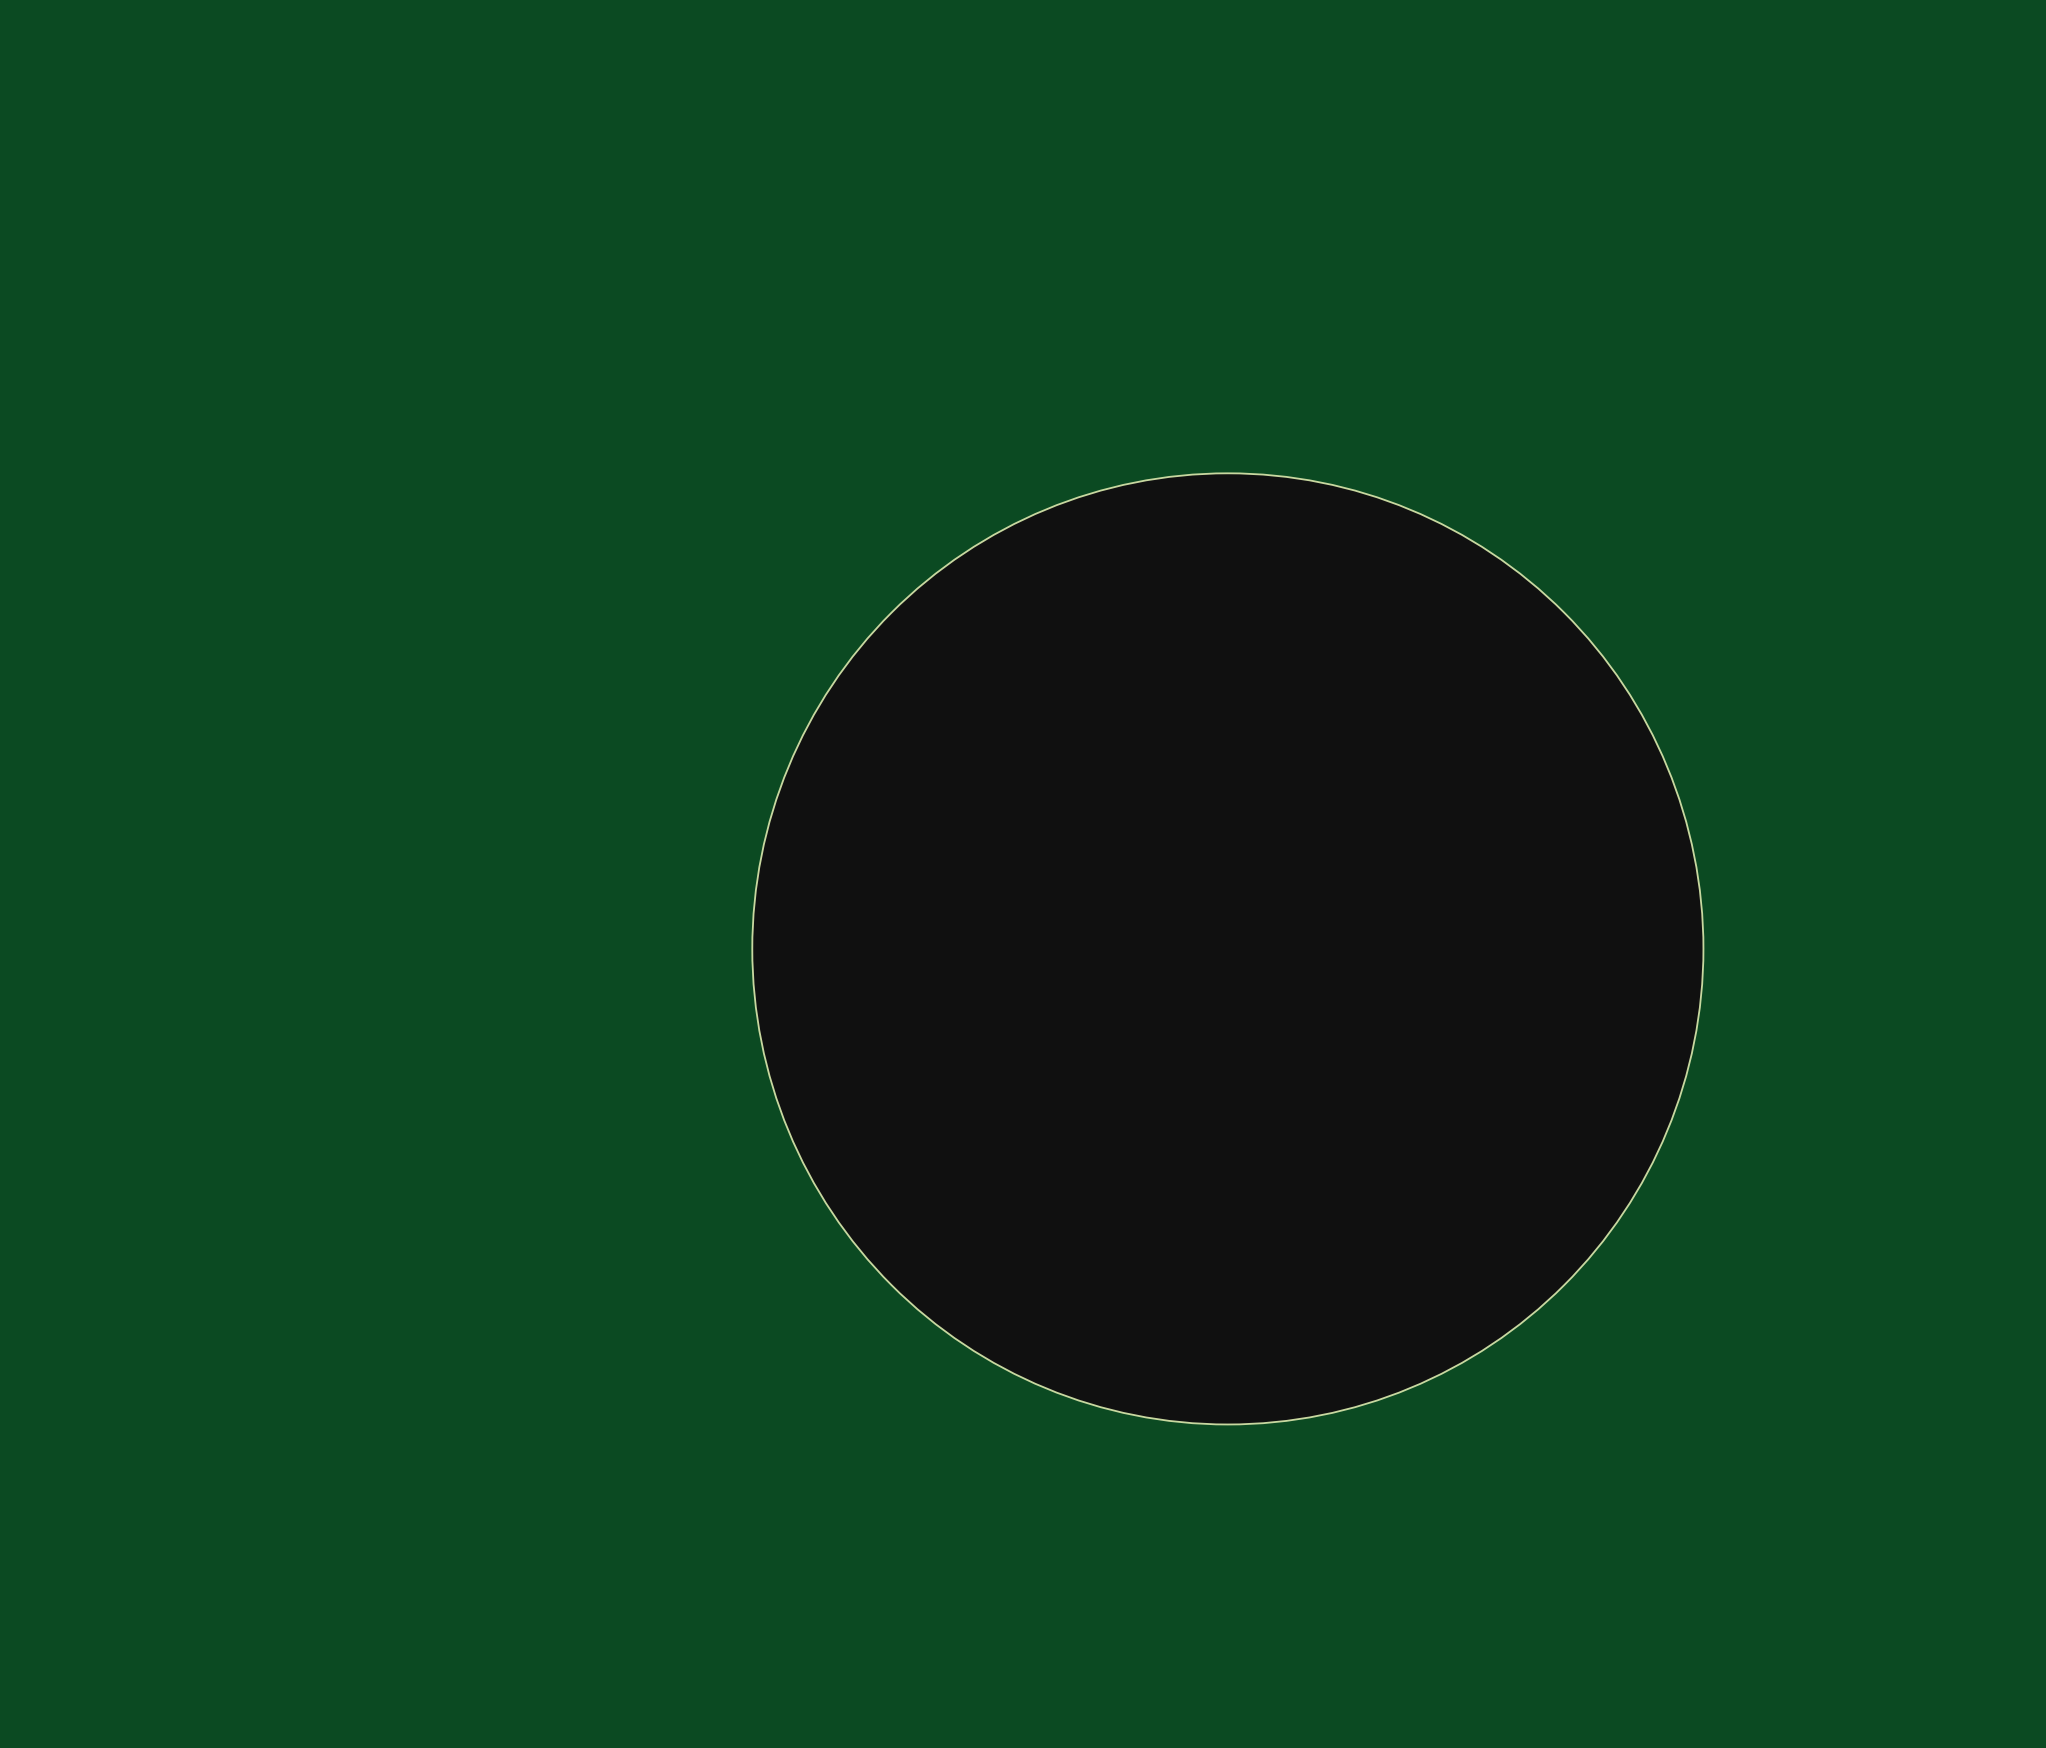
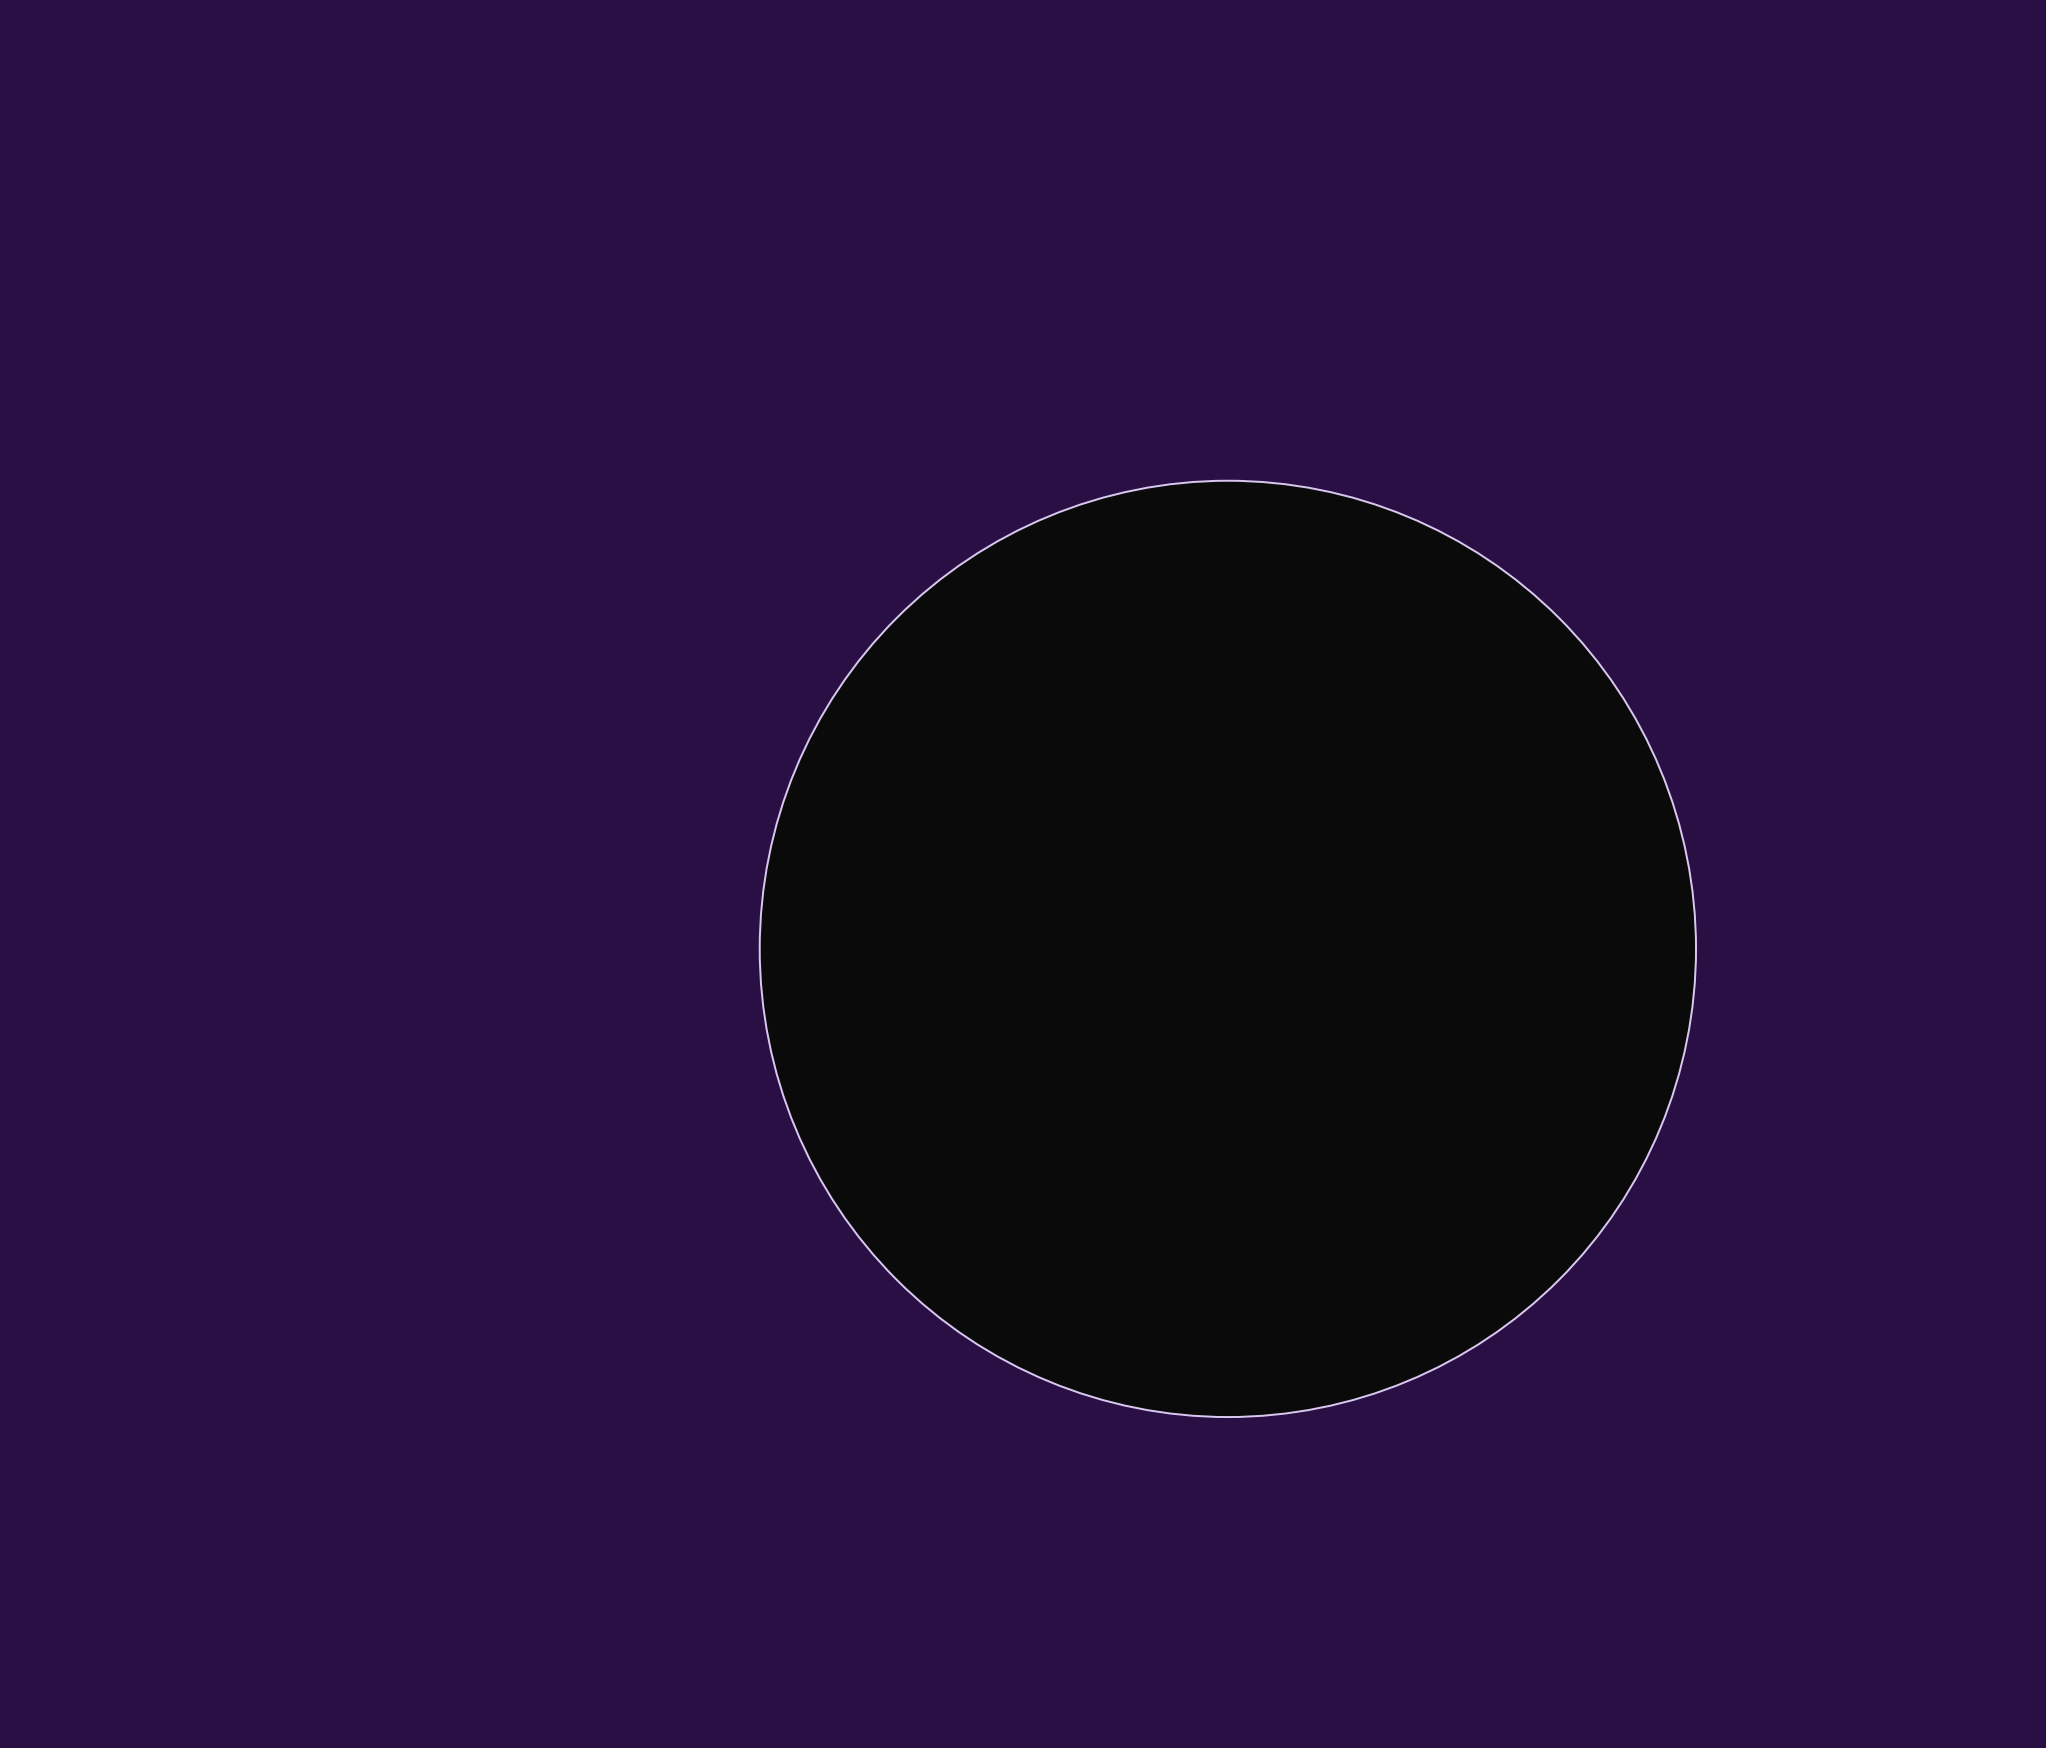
part footprint: [752, 473, 1704, 1425] -> [759, 480, 1697, 1418]

